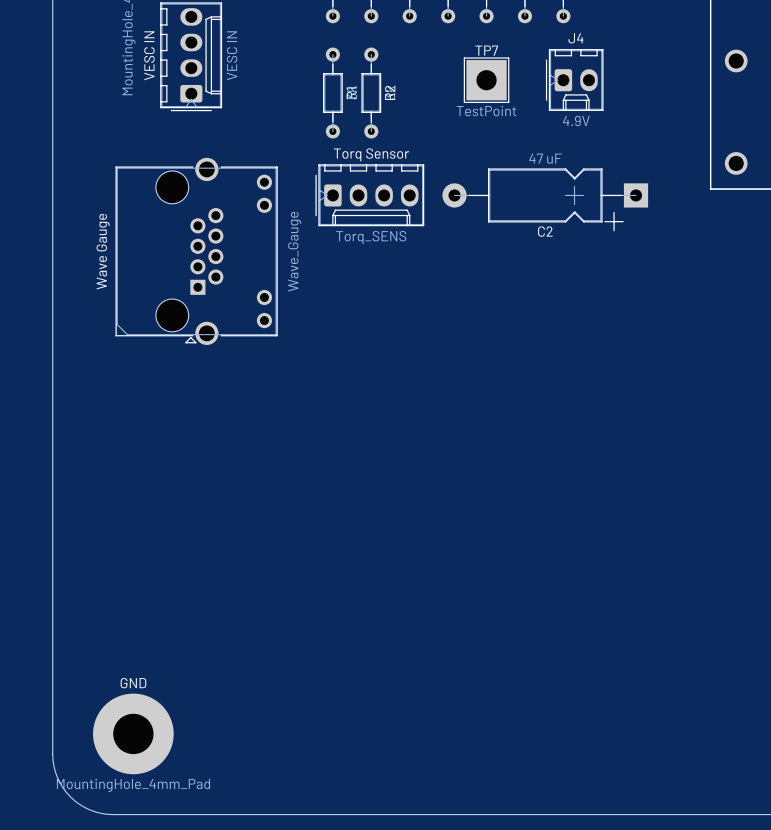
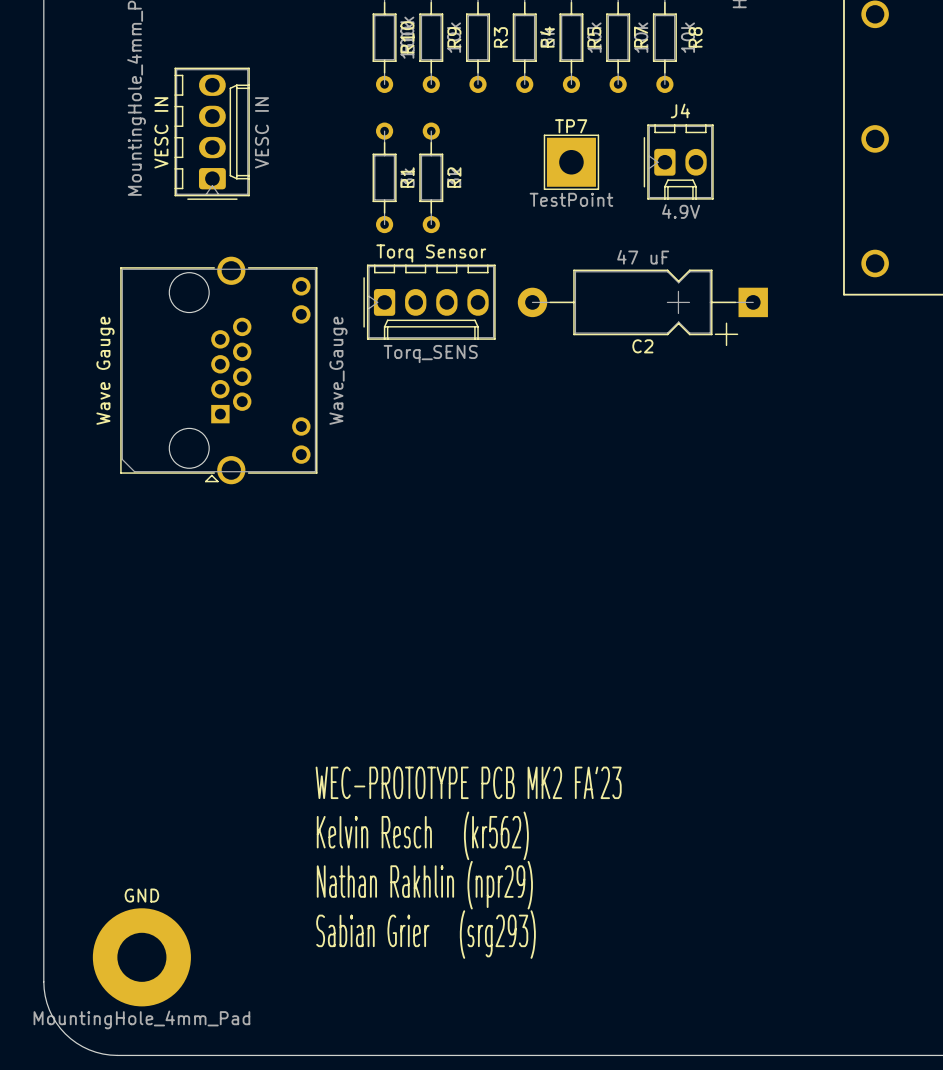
text: none -> WEC-PROTOTYPE PCB MK2 FA'23 (468, 782)
text: none -> Kelvin Resch (kr562) (422, 835)
text: none -> Nathan Rakhlin (npr29) (424, 885)
text: none -> Sabian Grier (srg293) (426, 934)

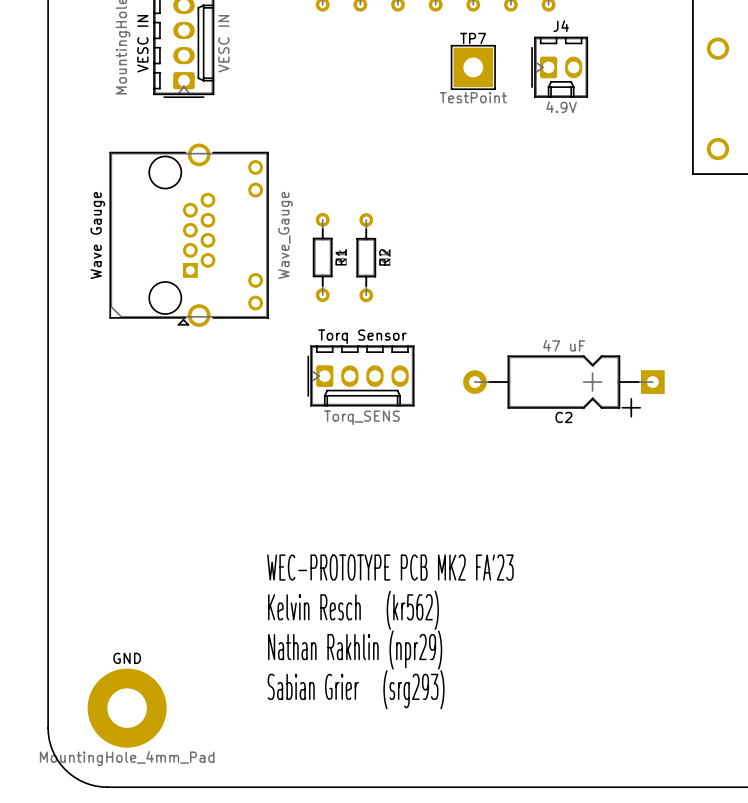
R1 position: (384, 177) -> (322, 257)
R2 position: (431, 177) -> (366, 257)
Torq Sensor position: (429, 302) -> (360, 375)
C2 position: (642, 307) -> (563, 386)

